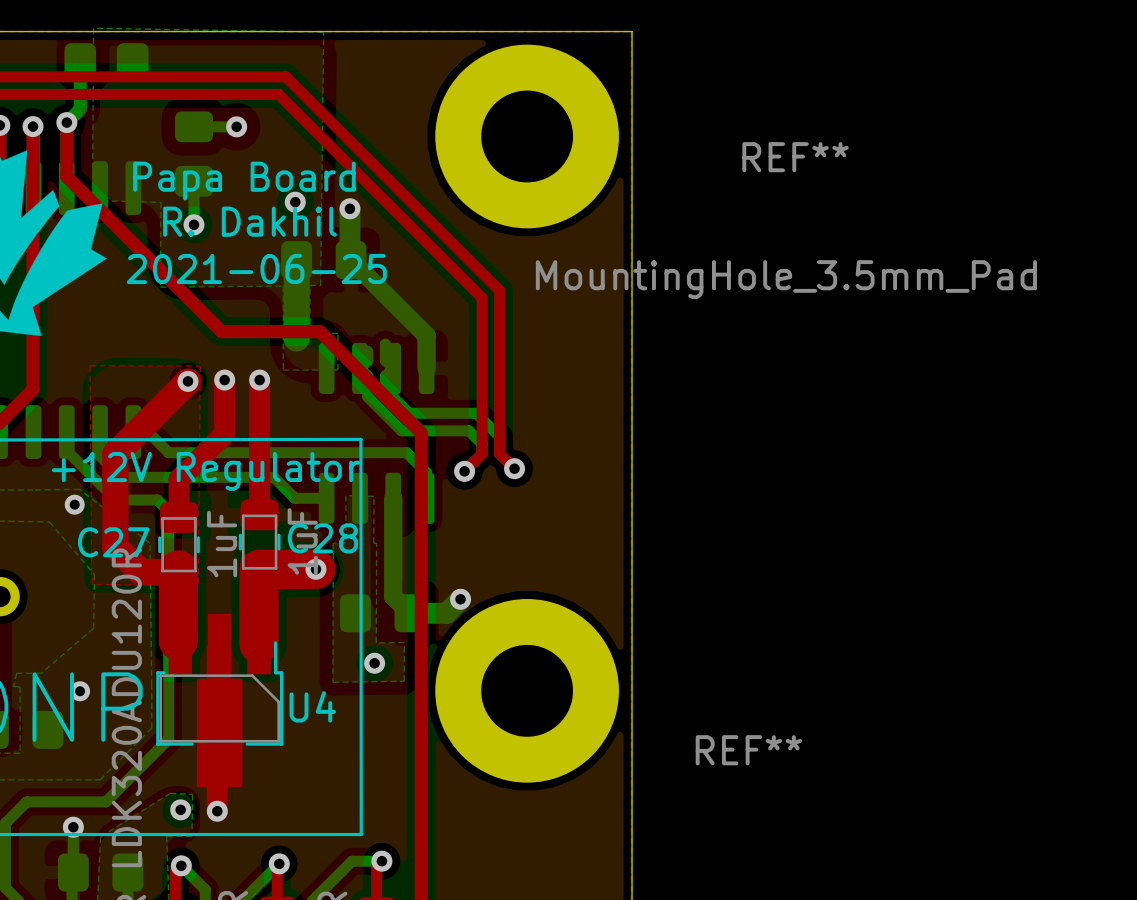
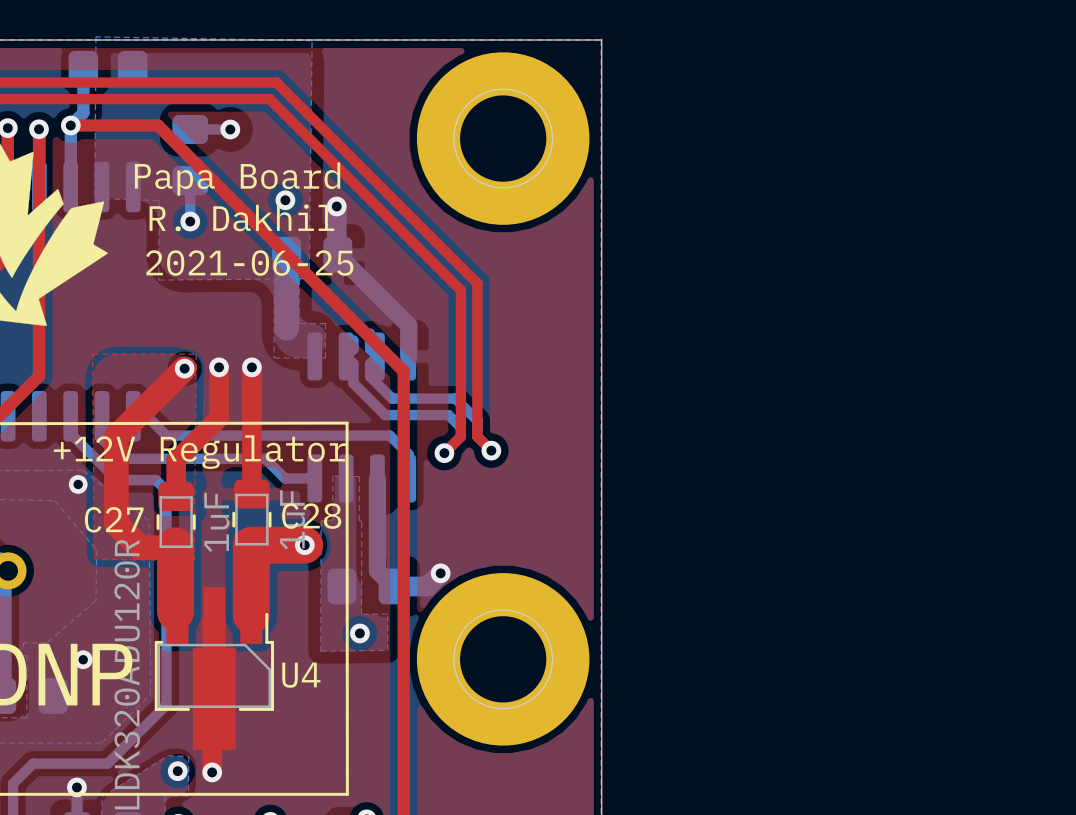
top track: (66, 122) (66, 176) (221, 331) (319, 331) (421, 432) -> (70, 125) (157, 125) (403, 371) (403, 417)
REF** name: REF** (795, 157) -> none
REF** value: MountingHole_3.5mm_Pad (786, 279) -> none
REF** name: REF** (748, 750) -> none

